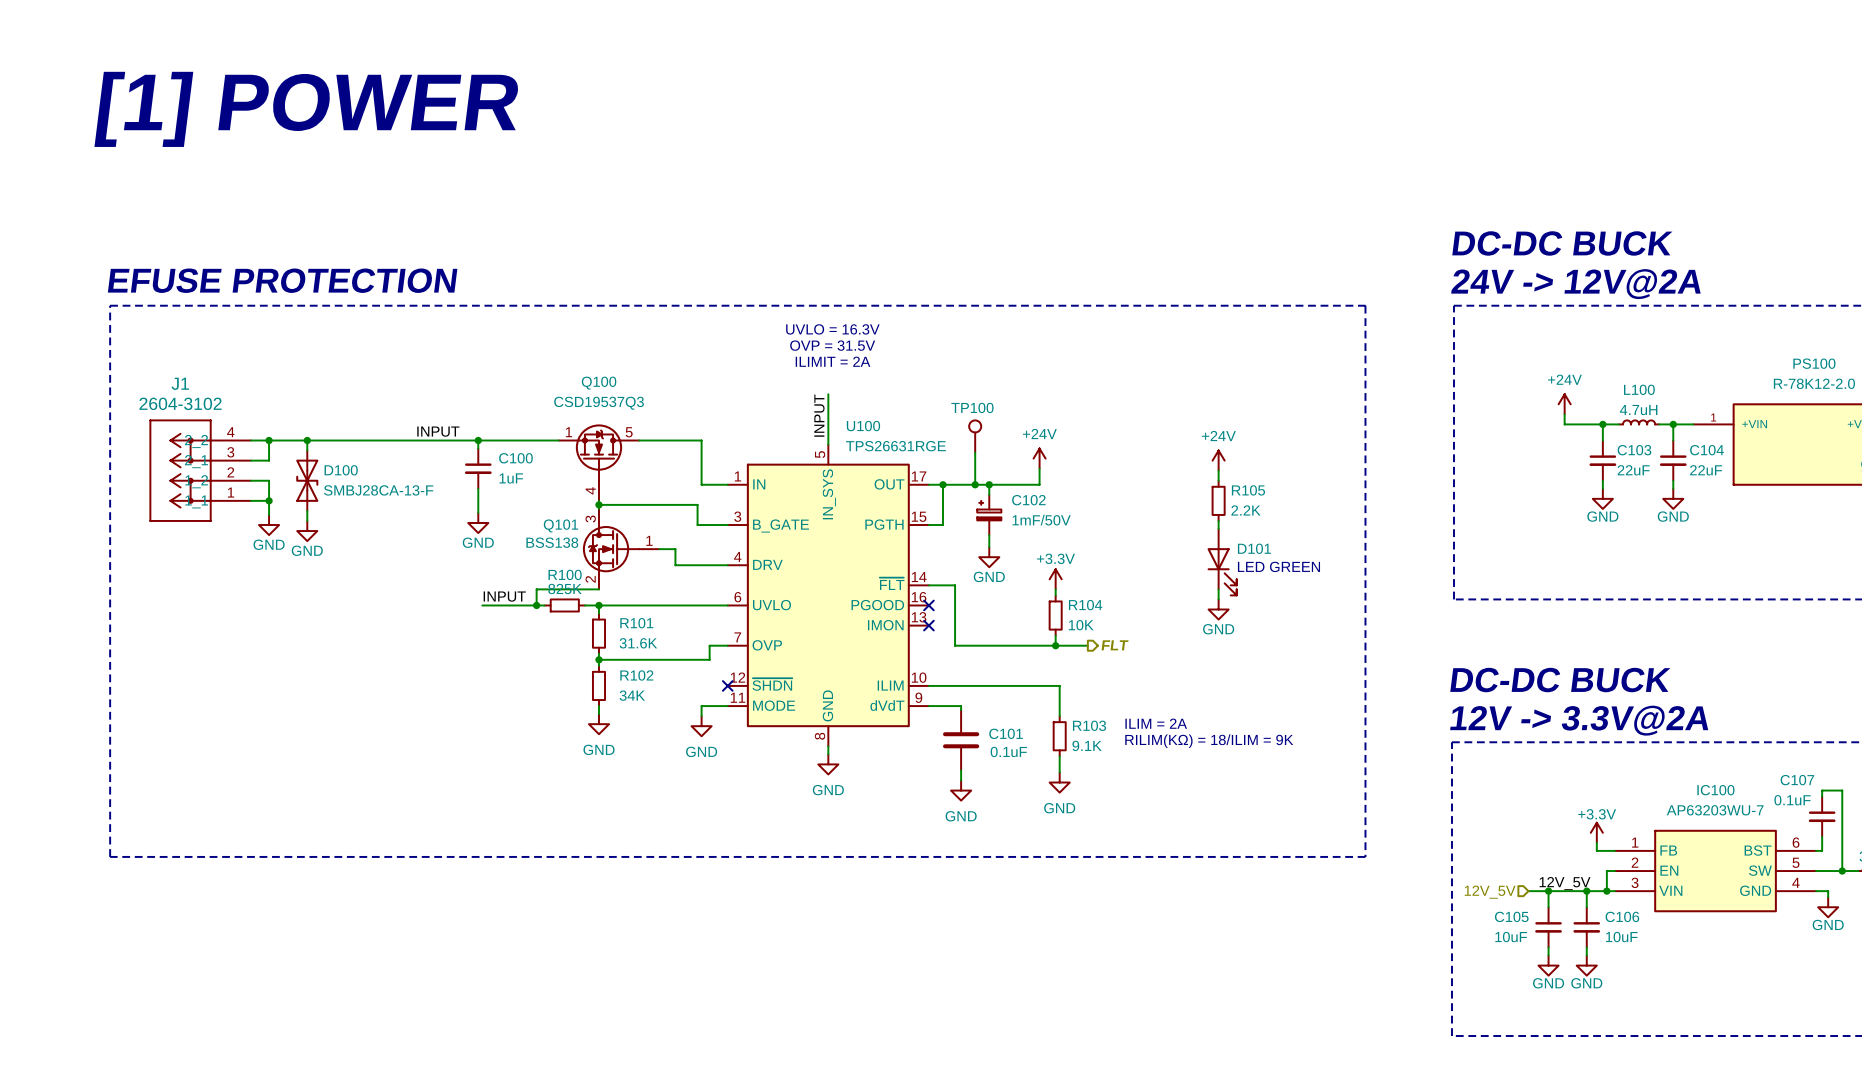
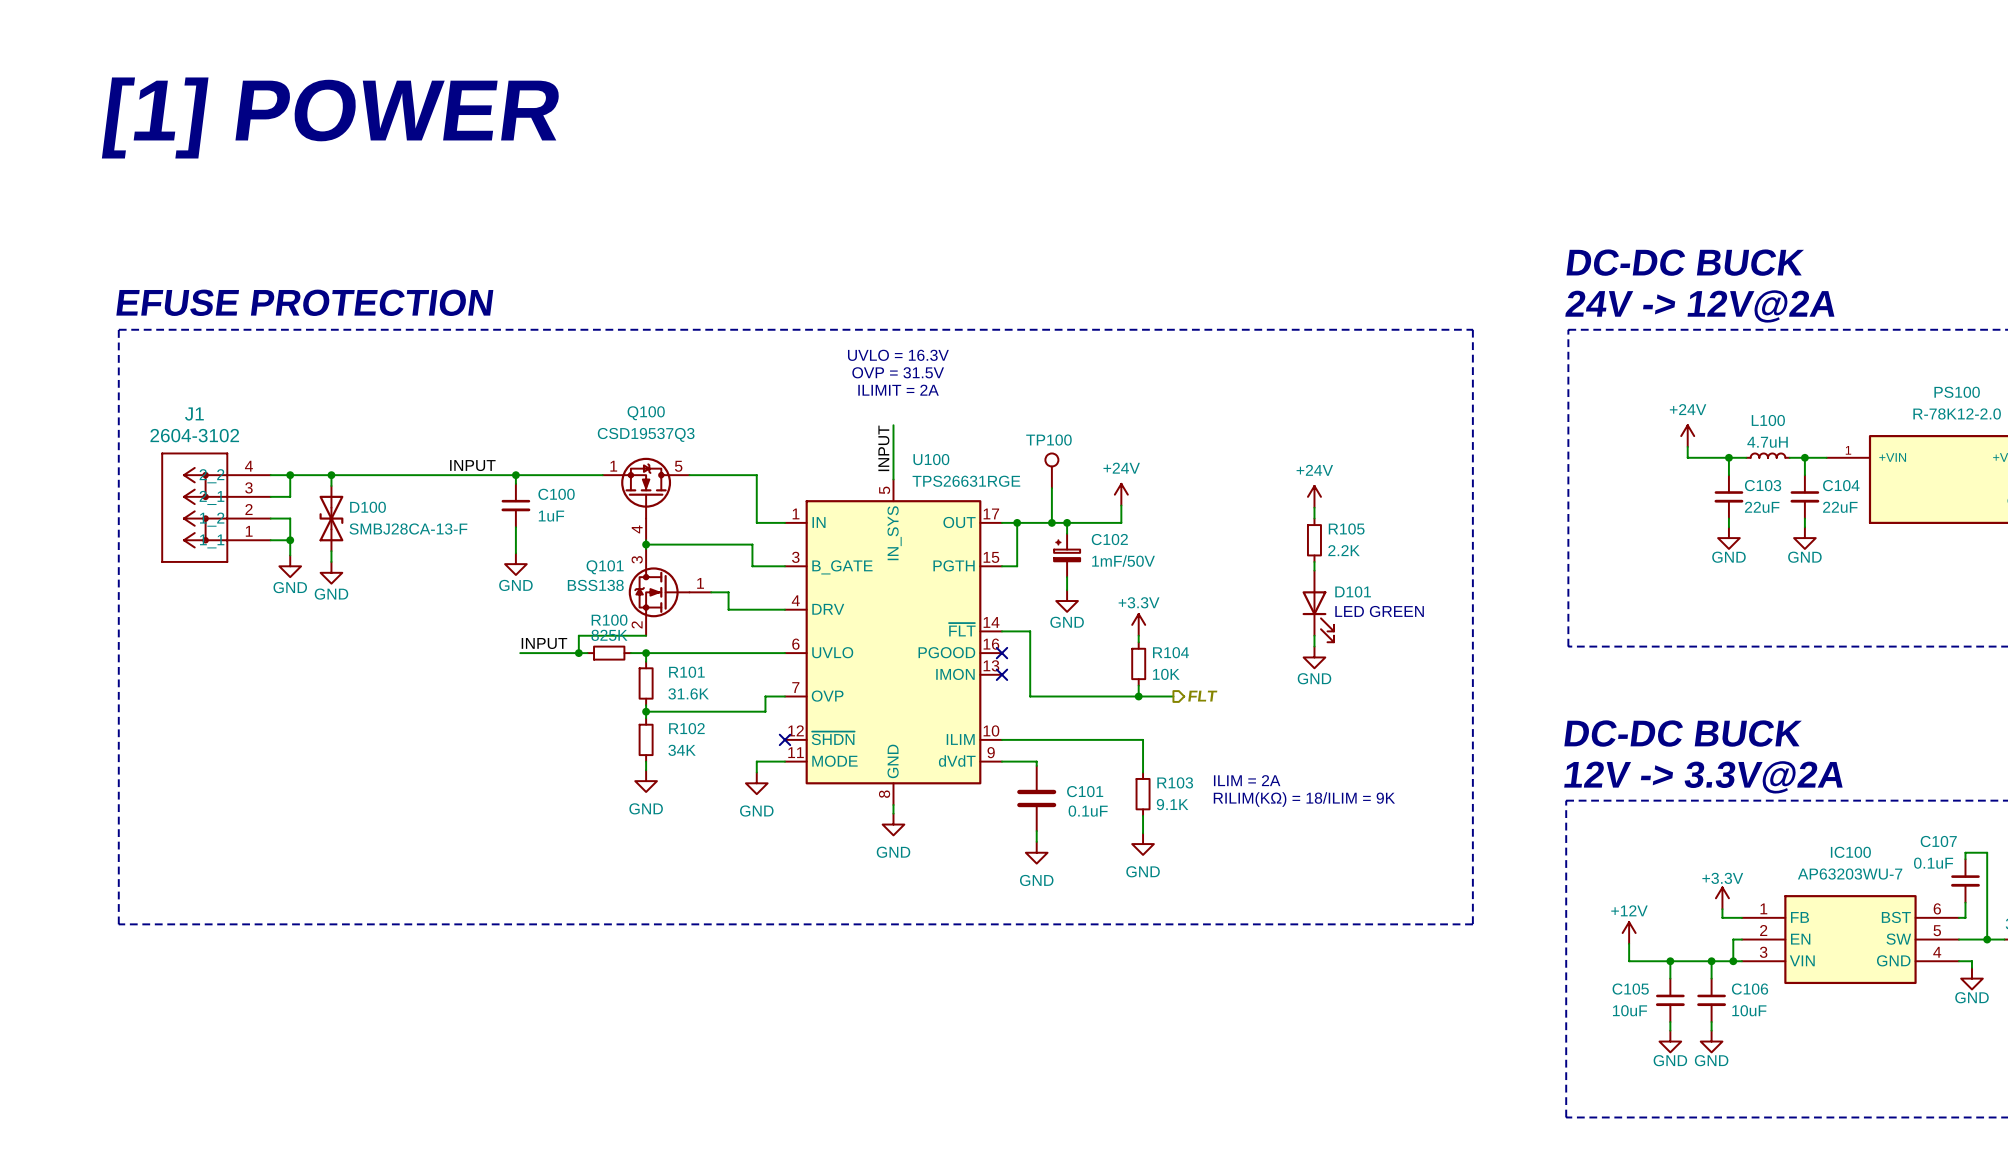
power symbol: none -> +12V (1629, 933)
wire: none -> (1629, 943) (1629, 961) (1648, 961)
label: 12V_5V (1565, 883) -> none
hierarchical label: 12V_5V (1490, 892) -> none

